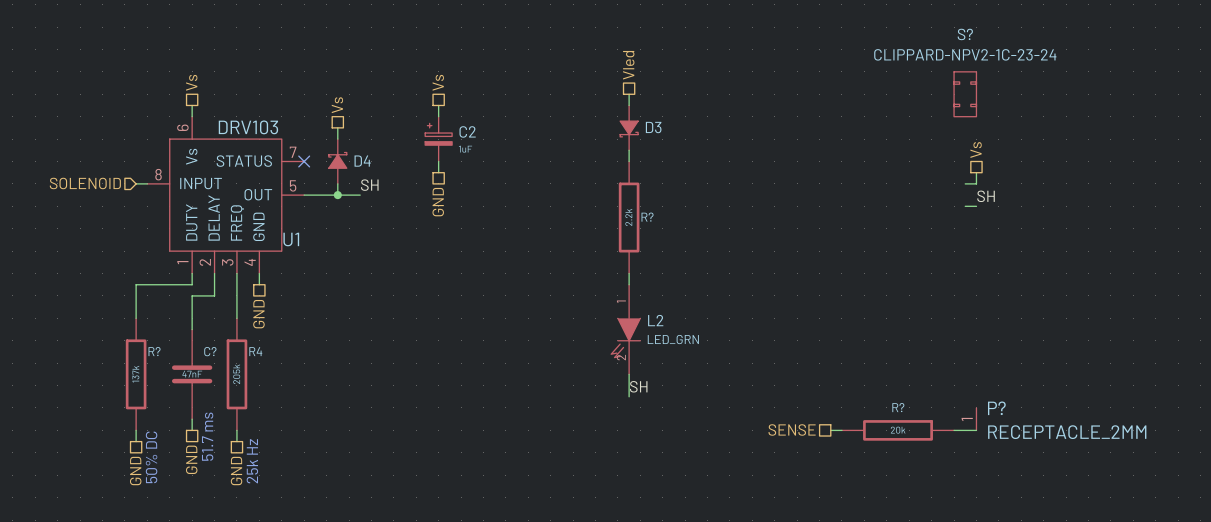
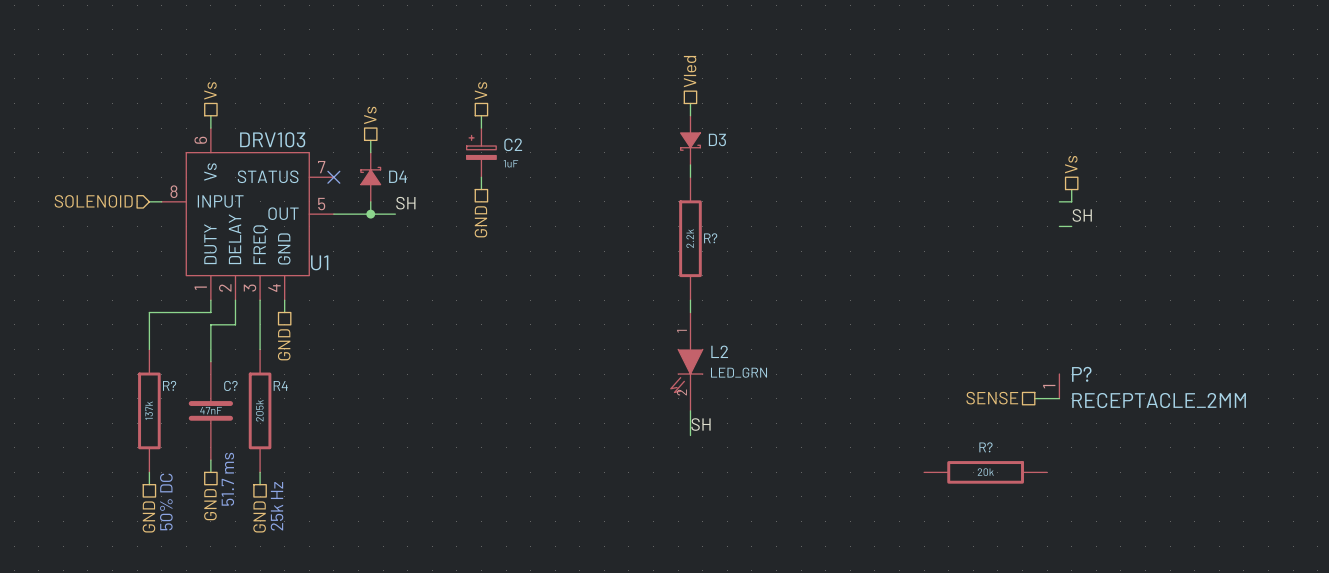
S?: CLIPPARD-NPV2-1C-23-24 (965, 94) -> none
P? position: (976, 419) -> (1059, 386)
hierarchical label position: SENSE (792, 429) -> SENSE (992, 398)
wire: (830, 430) (841, 430) -> none
wire: (954, 430) (976, 430) -> (1034, 398) (1059, 398)

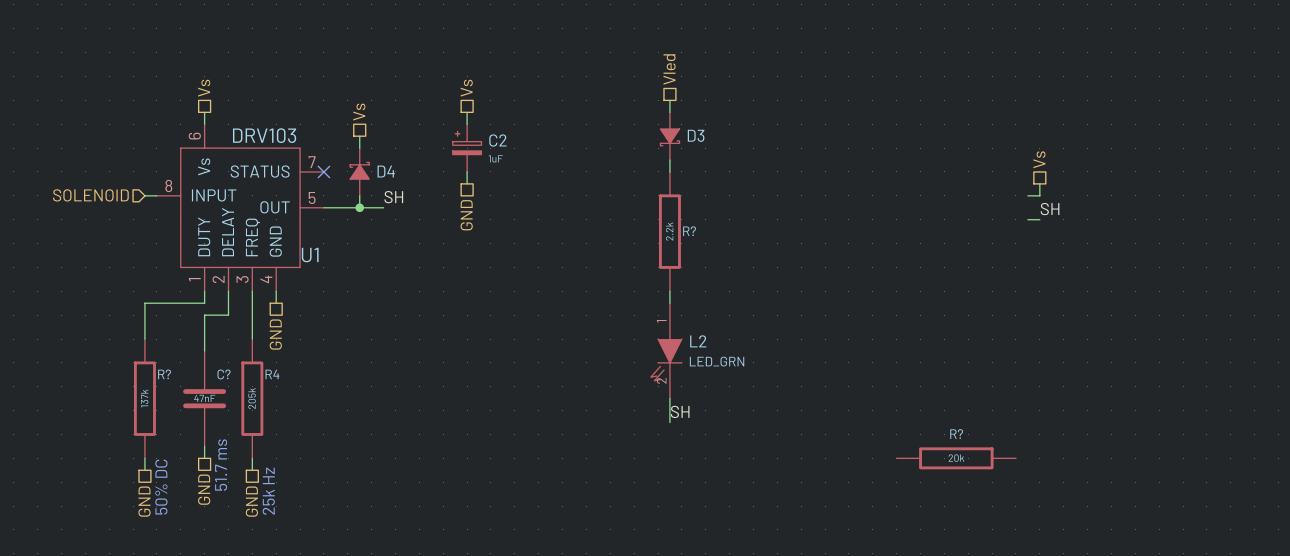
P?: RECEPTACLE_2MM (1059, 386) -> none
hierarchical label: SENSE (992, 398) -> none
wire: (1034, 398) (1059, 398) -> none

